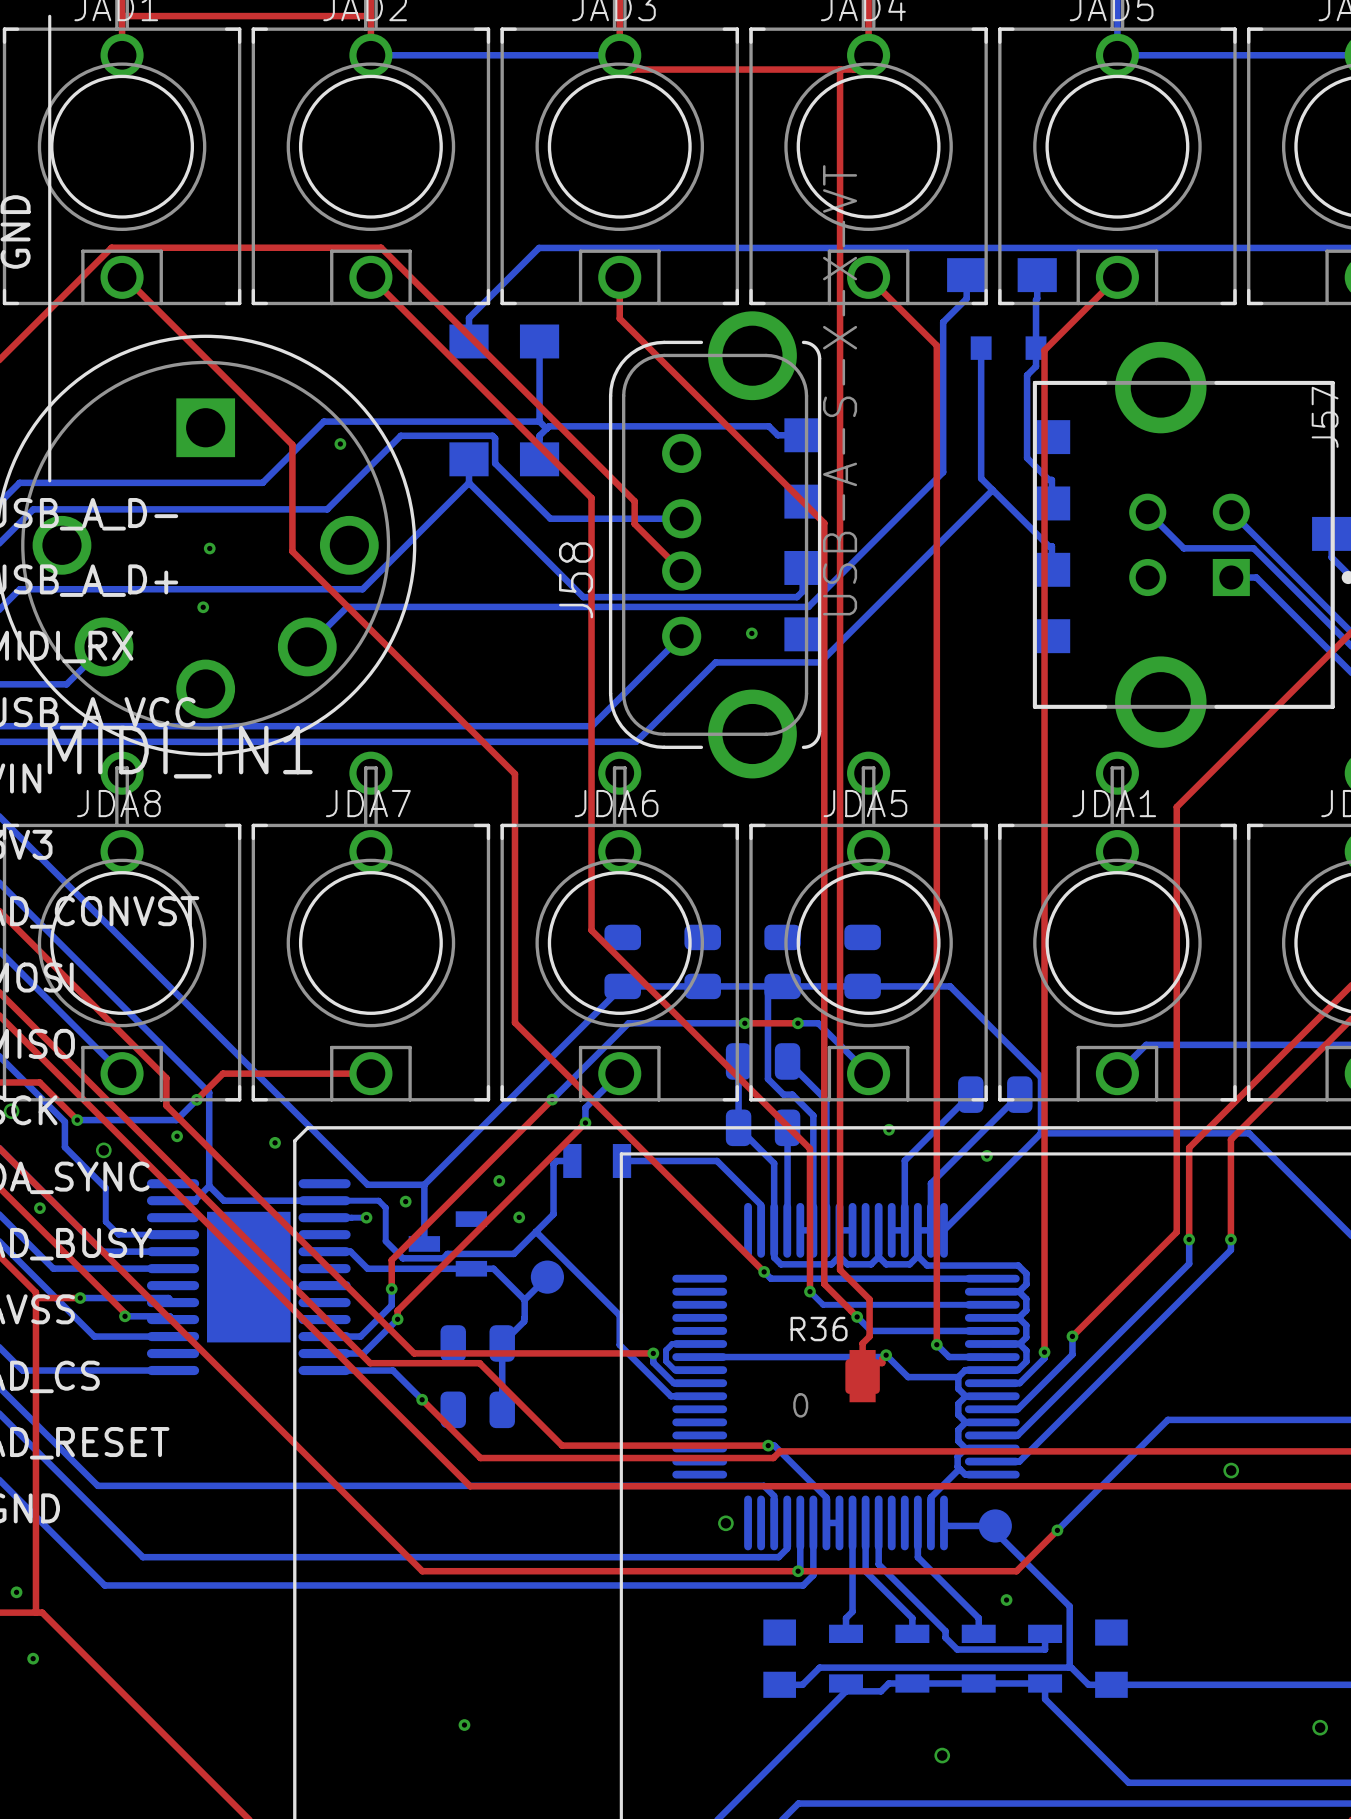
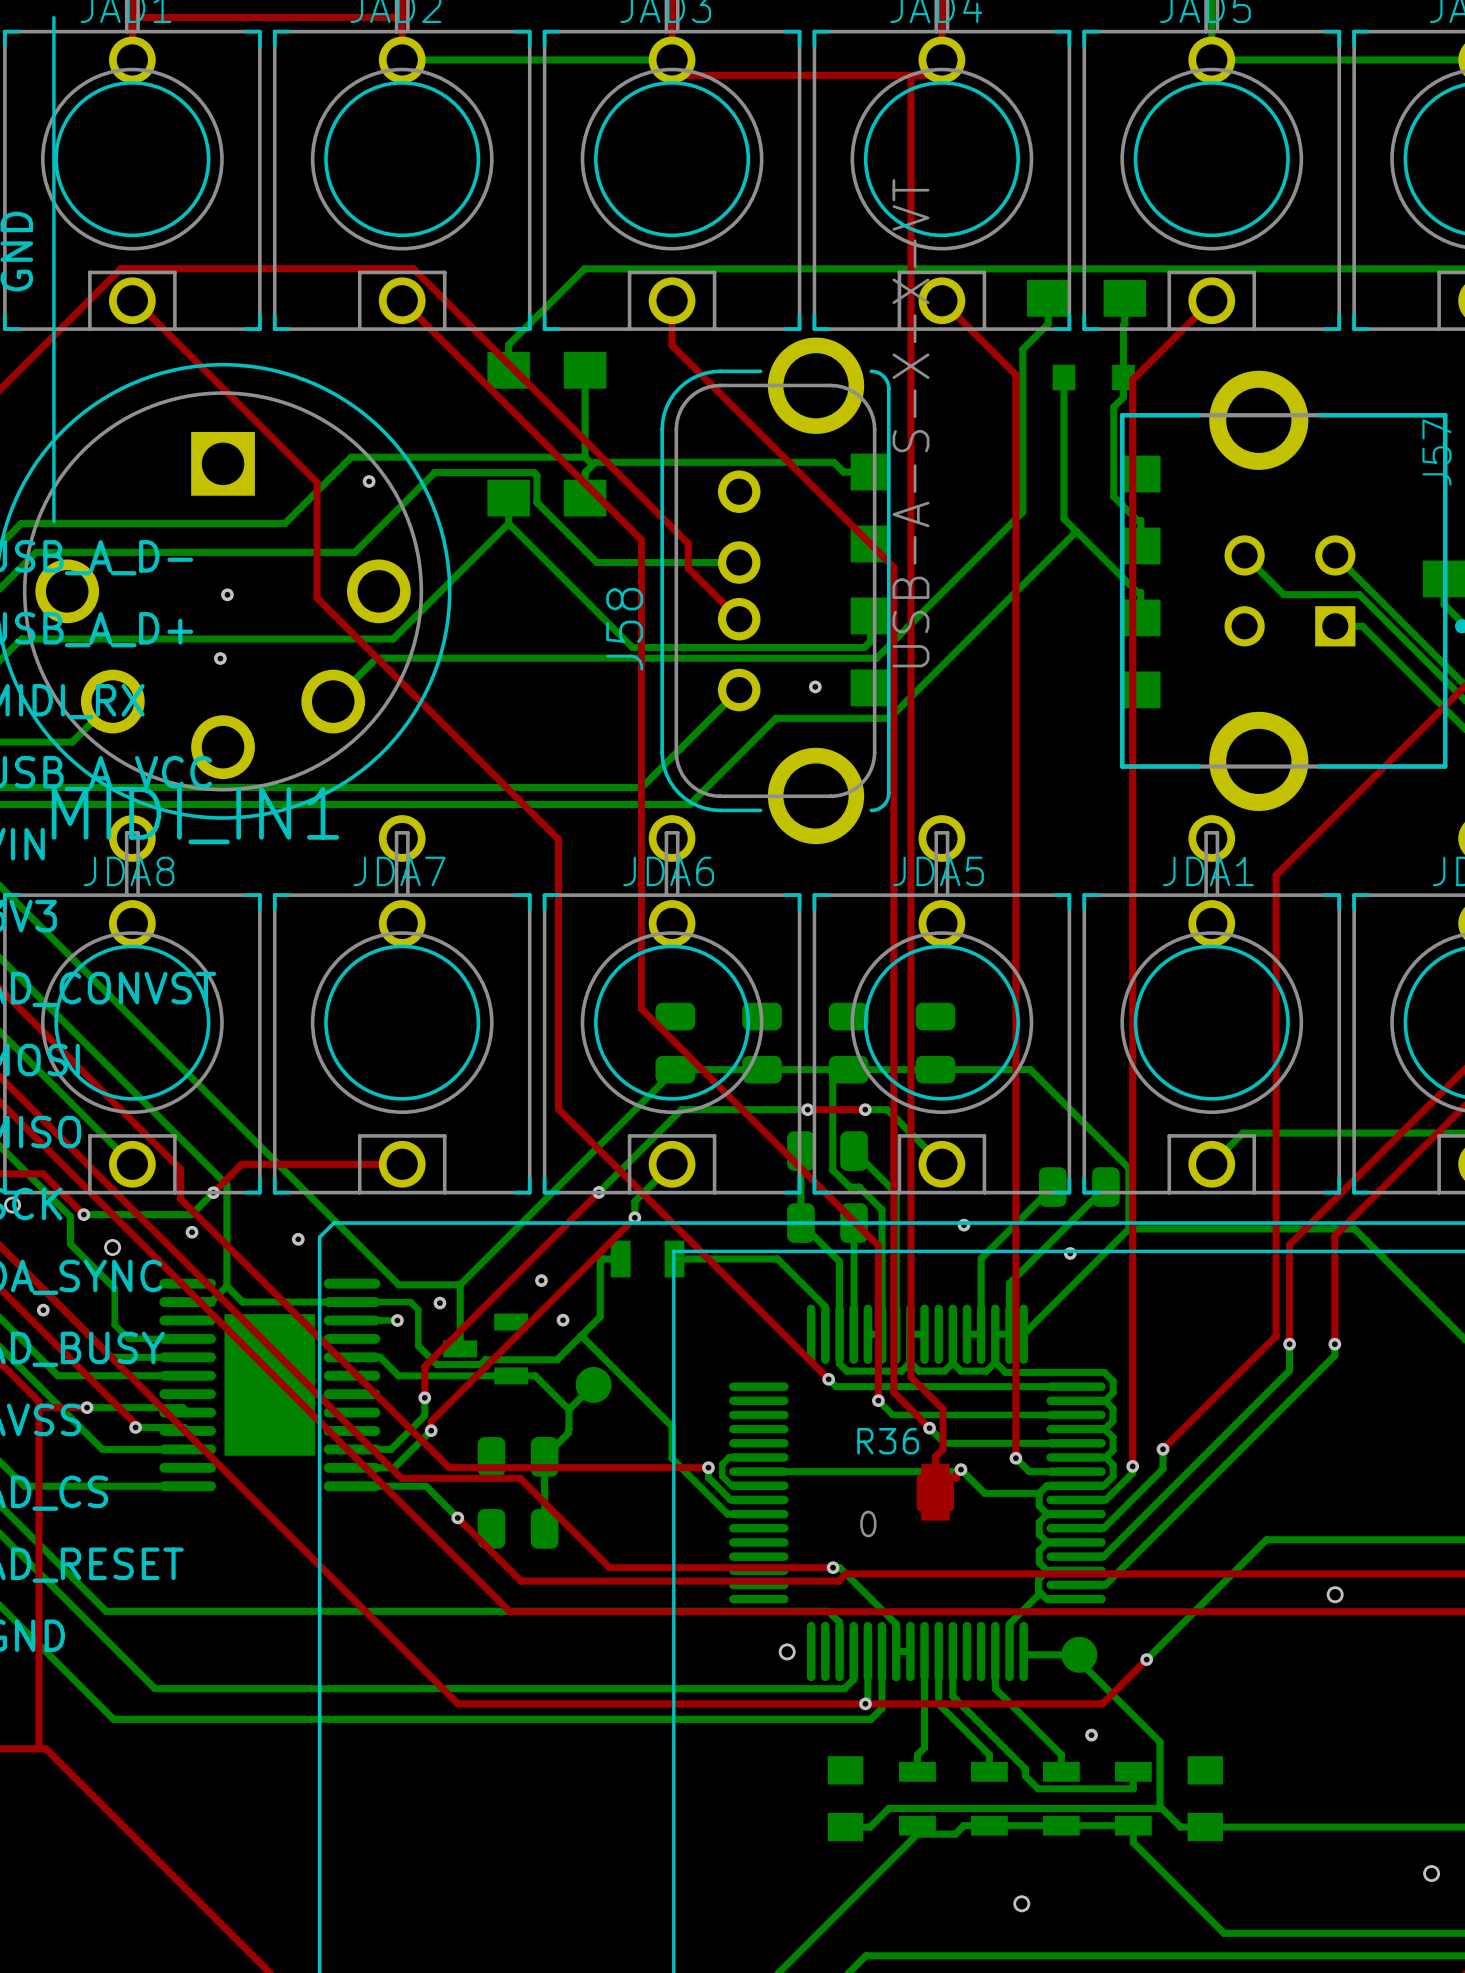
via: (16, 1592) -> none
via: (33, 1658) -> none
via: (464, 1725) -> none

